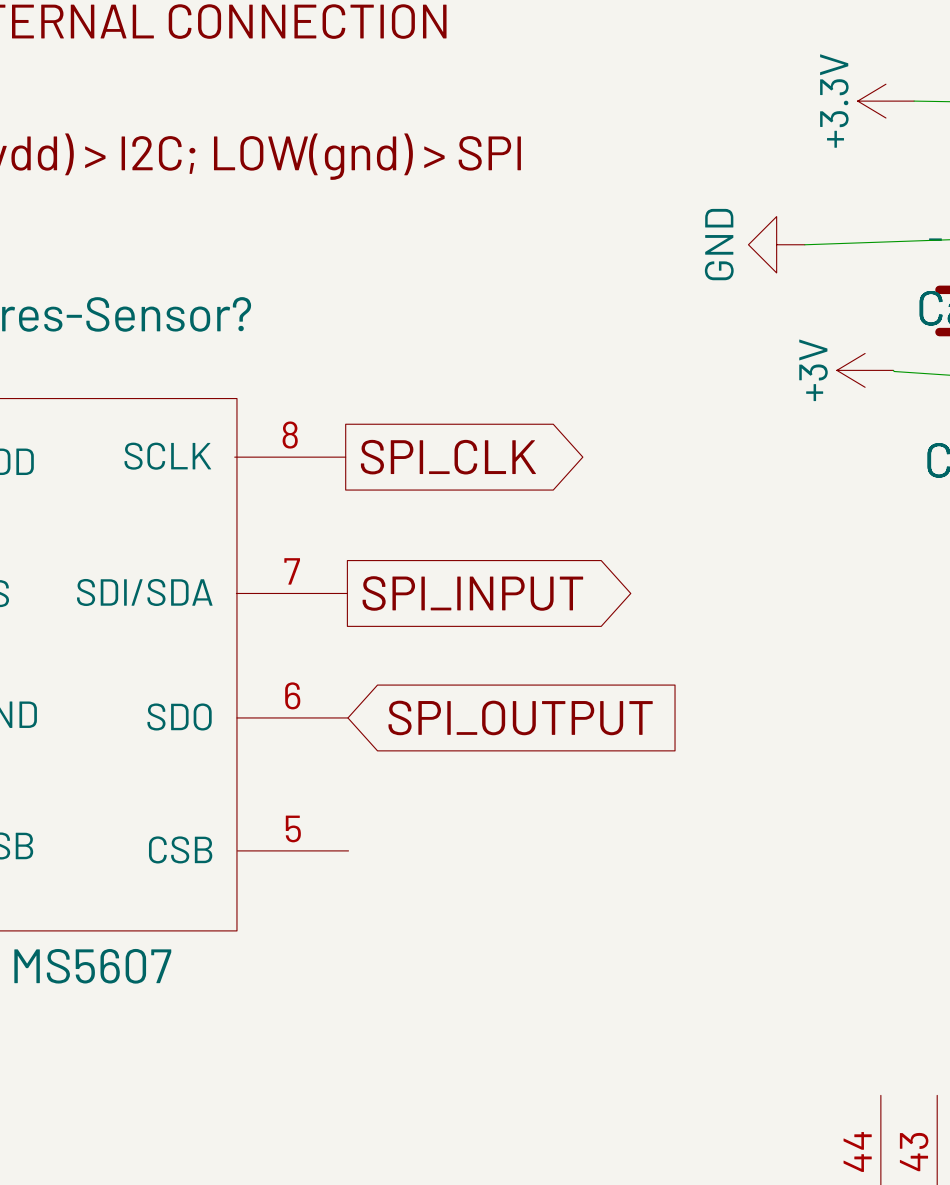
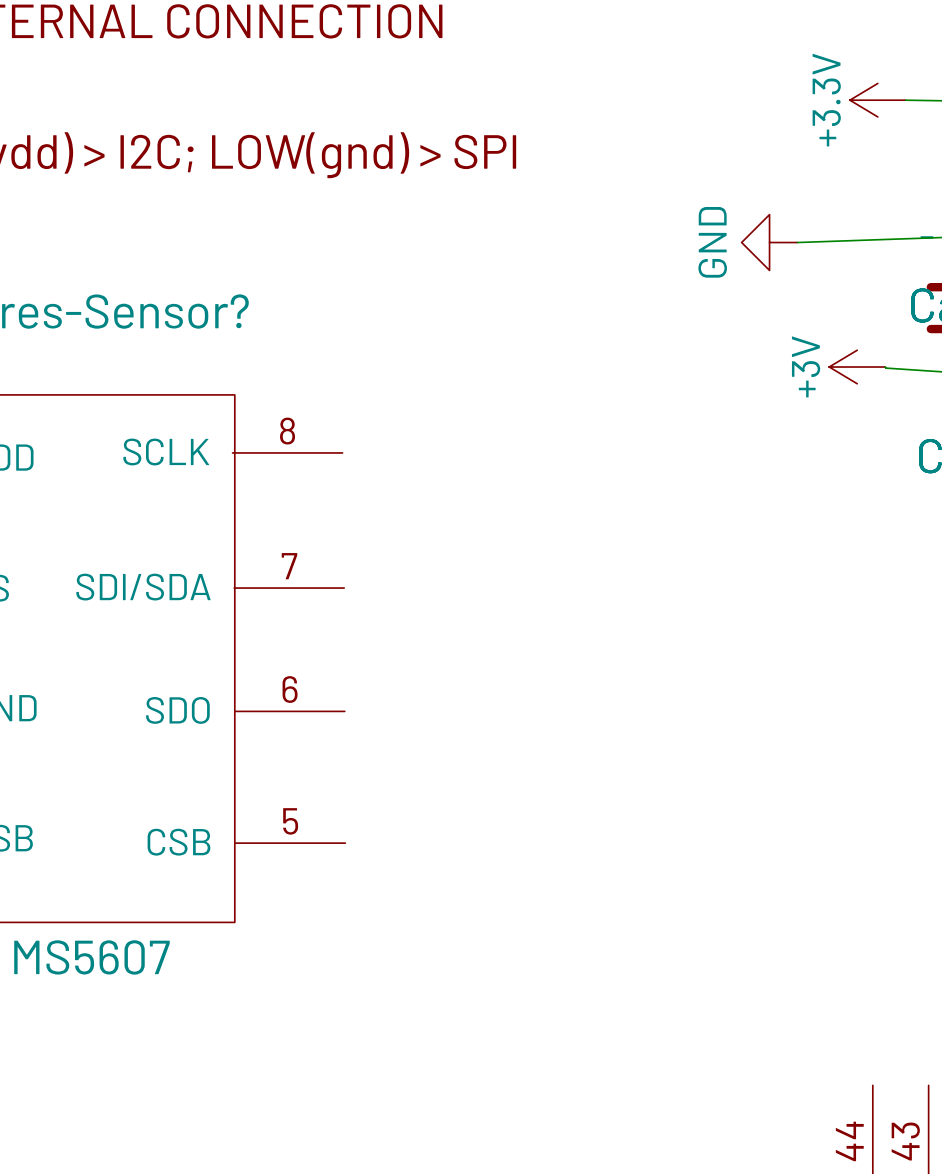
global label: SPI_CLK (448, 457) -> none
global label: SPI_INPUT (472, 593) -> none
global label: SPI_OUTPUT (520, 717) -> none

